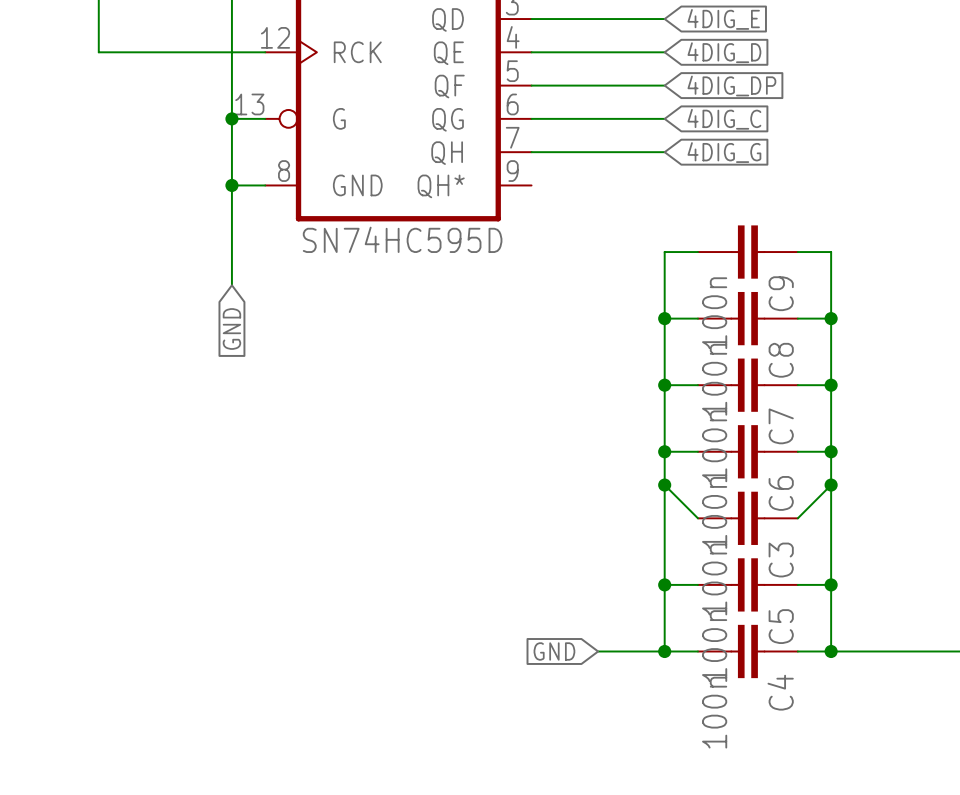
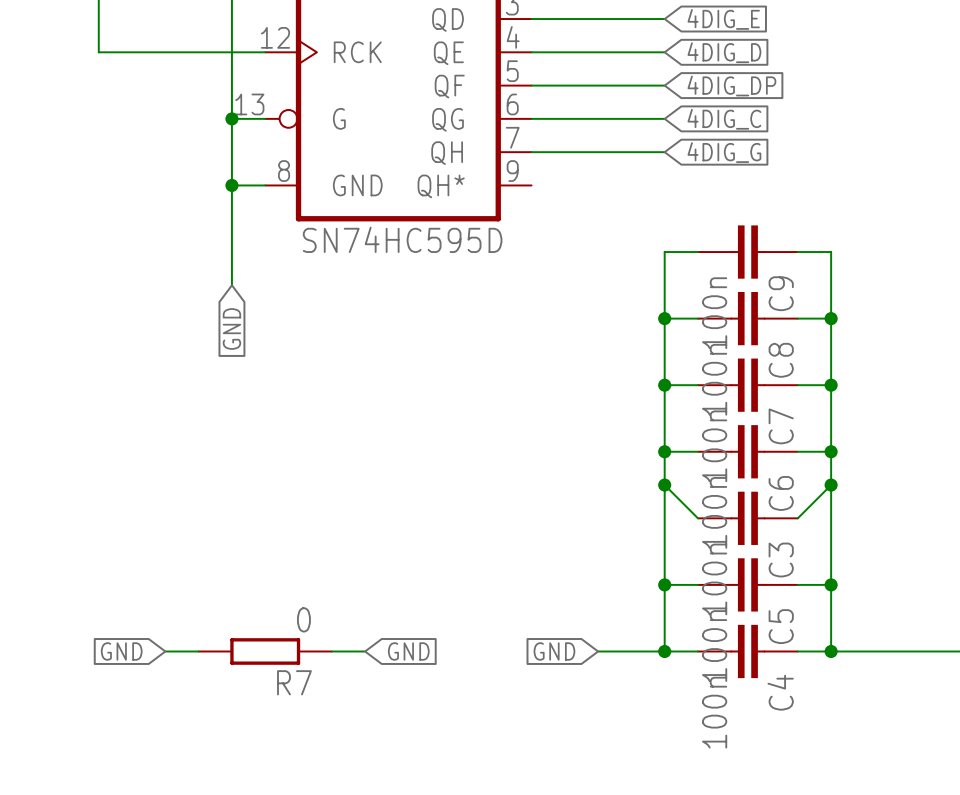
global label: none -> GND (121, 651)
wire: none -> (165, 651) (198, 651)
R7: none -> 0 (265, 651)
wire: none -> (331, 651) (365, 651)
global label: none -> GND (408, 651)

